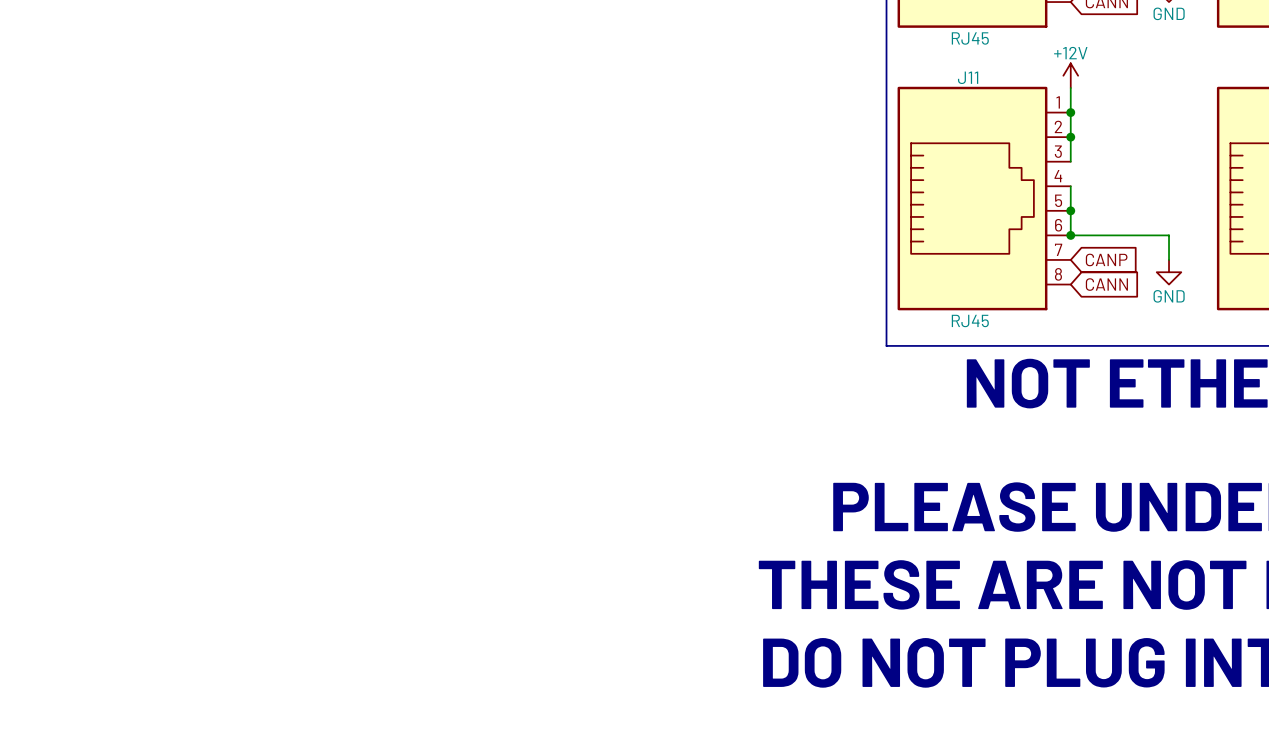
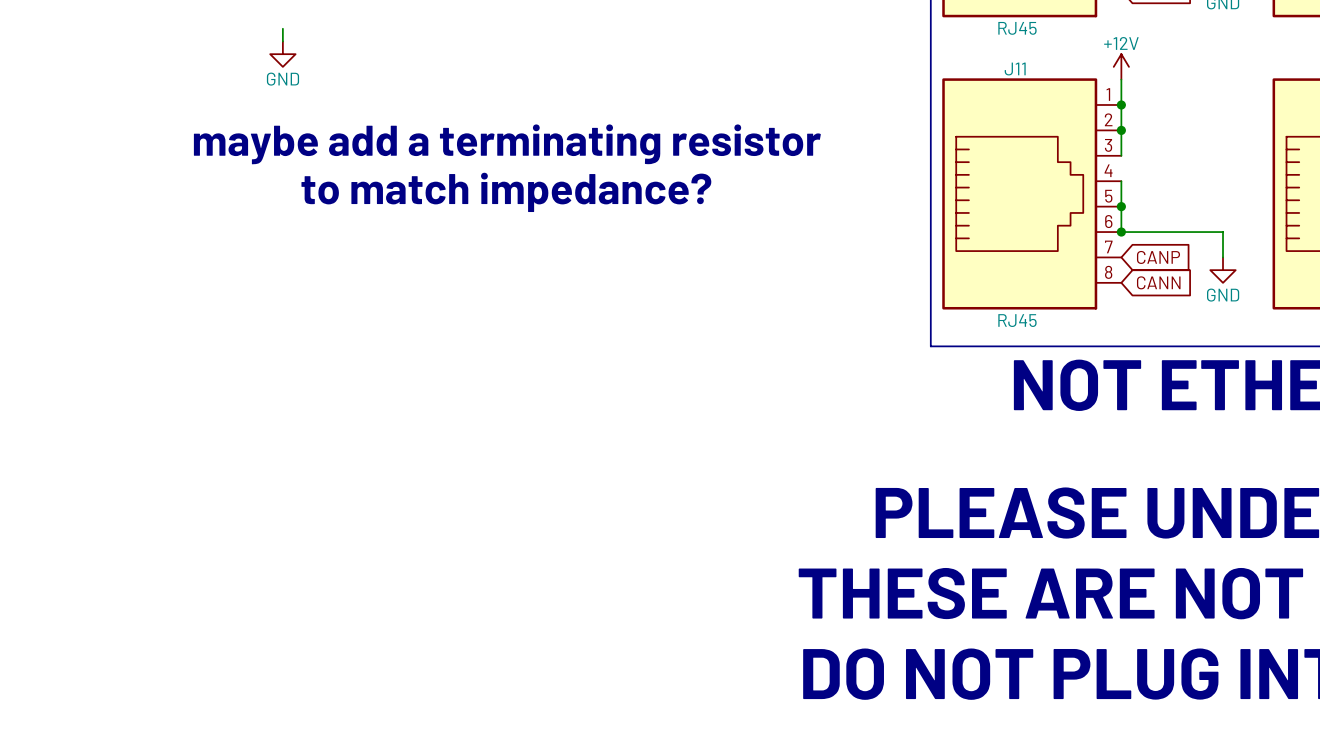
wire: none -> (282, 28) (282, 41)
power symbol: none -> GND (282, 54)
text: none -> maybe add a terminating resistor (507, 144)
text: none -> to match impedance? (506, 192)

